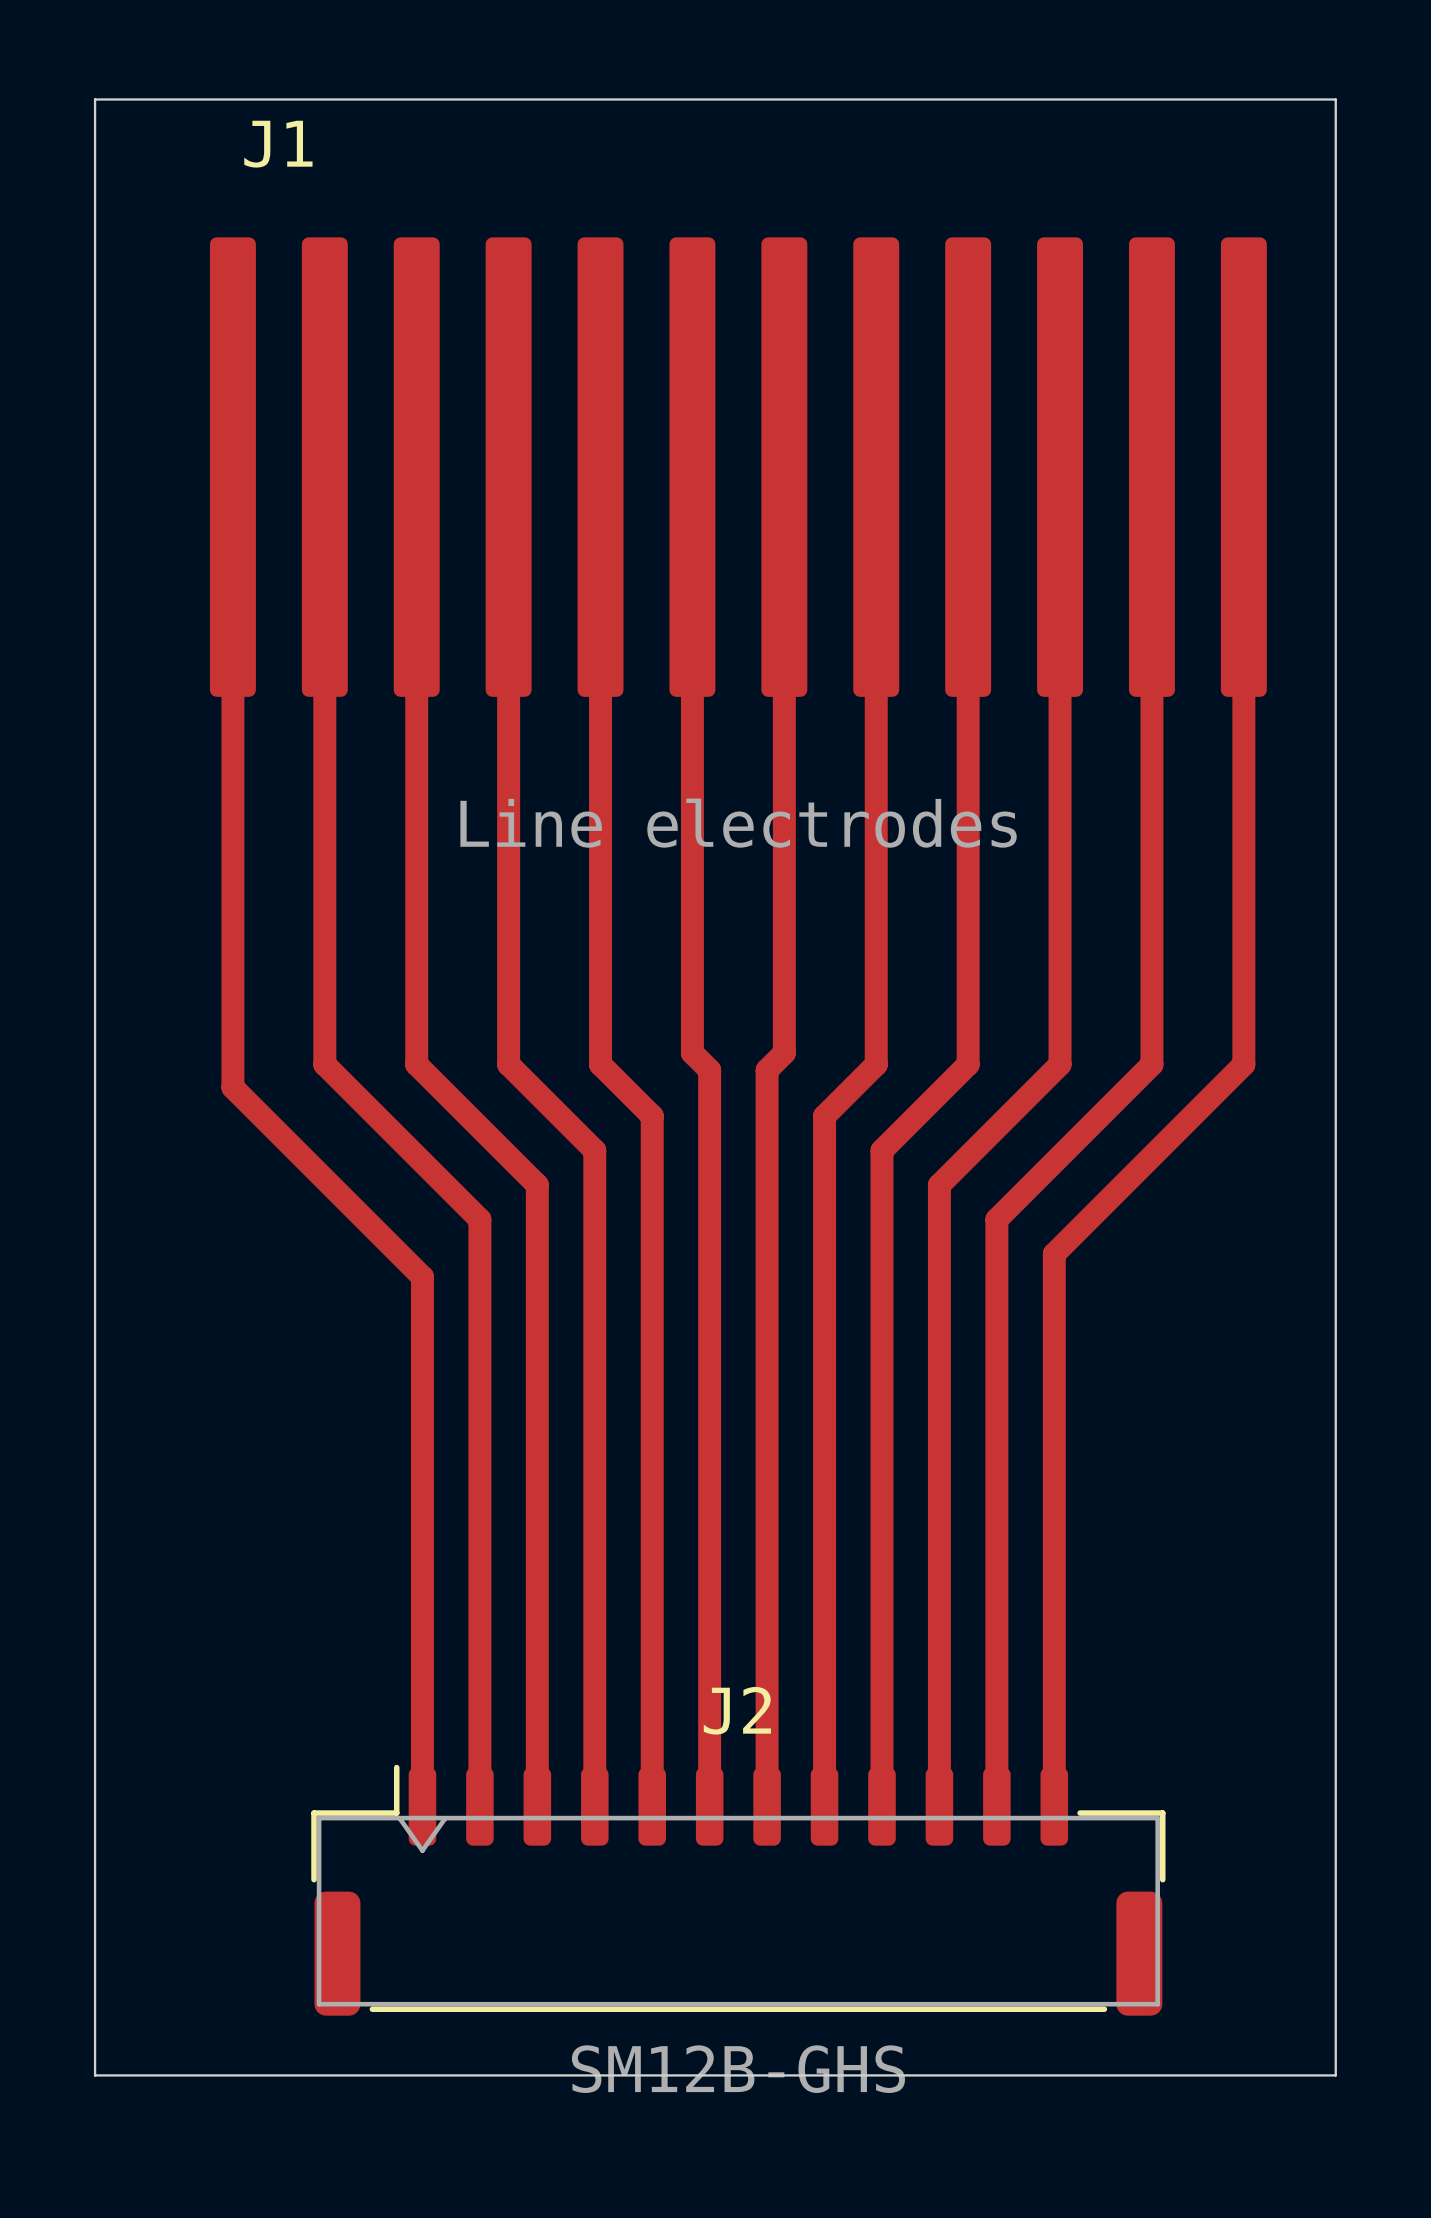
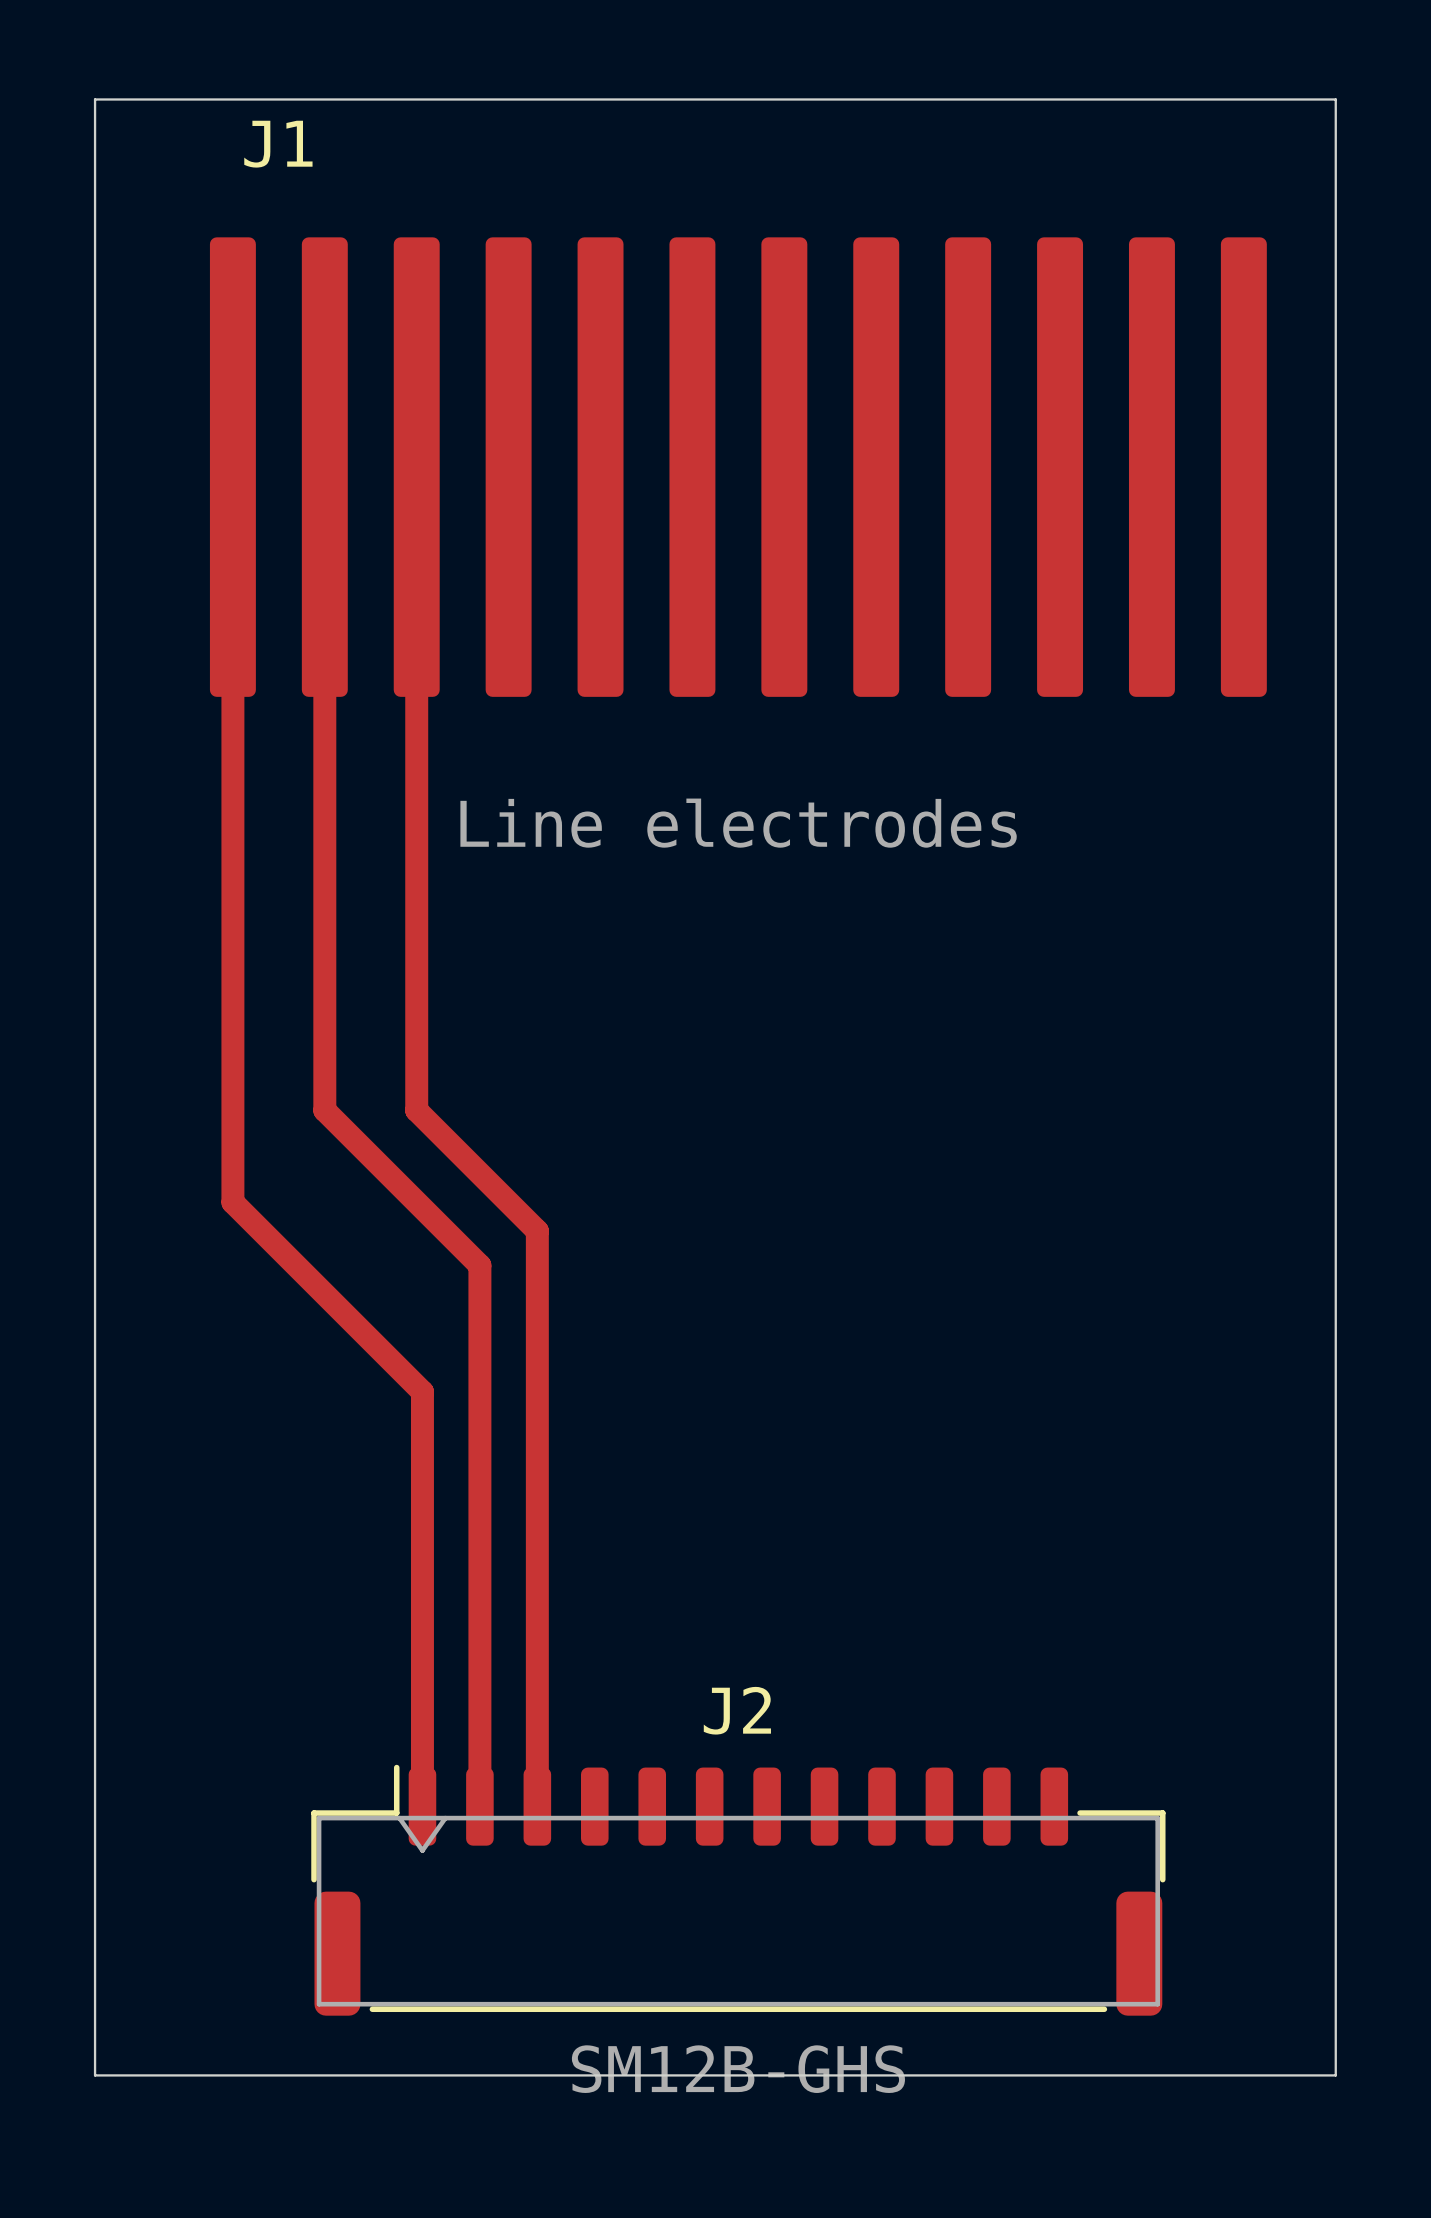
track: (508, 467) (508, 1064) (594, 1150) (594, 1806) -> none
track: (600, 467) (600, 1064) (652, 1116) (652, 1806) -> none
track: (692, 467) (692, 1052) (709, 1070) (709, 1806) -> none
track: (784, 467) (784, 1052) (767, 1070) (767, 1806) -> none
track: (876, 467) (876, 1064) (824, 1116) (824, 1806) -> none
track: (968, 467) (968, 1064) (881, 1150) (881, 1806) -> none
track: (1060, 467) (1060, 1064) (939, 1185) (939, 1806) -> none
track: (1151, 467) (1151, 1064) (996, 1219) (996, 1806) -> none
track: (1243, 467) (1243, 1064) (1054, 1254) (1054, 1806) -> none
track: (324, 1064) (479, 1219) (479, 1265) -> (324, 1064) (324, 1110) (479, 1265)
track: (416, 1064) (537, 1185) (537, 1231) -> (416, 1064) (416, 1110) (537, 1231)
track: (232, 1087) (422, 1277) (422, 1391) -> (232, 1087) (232, 1202) (422, 1391)

